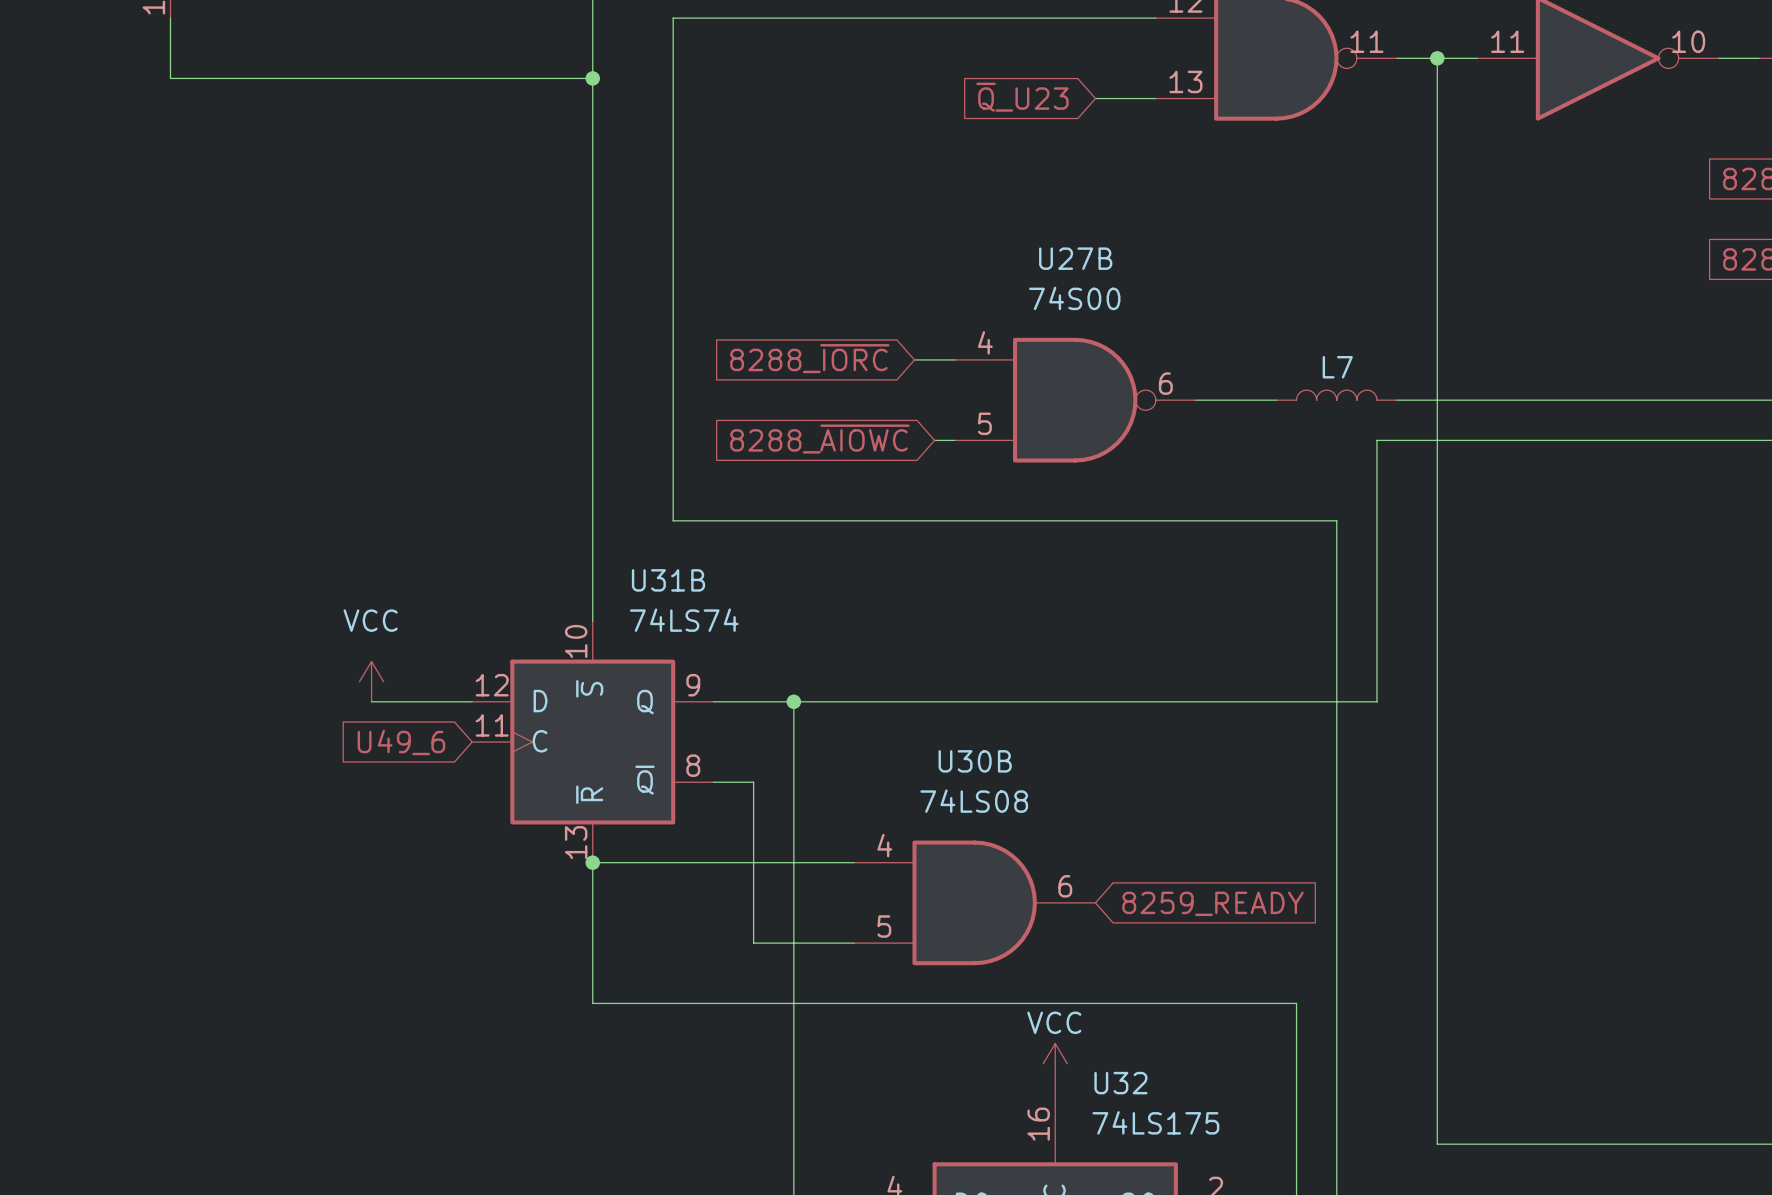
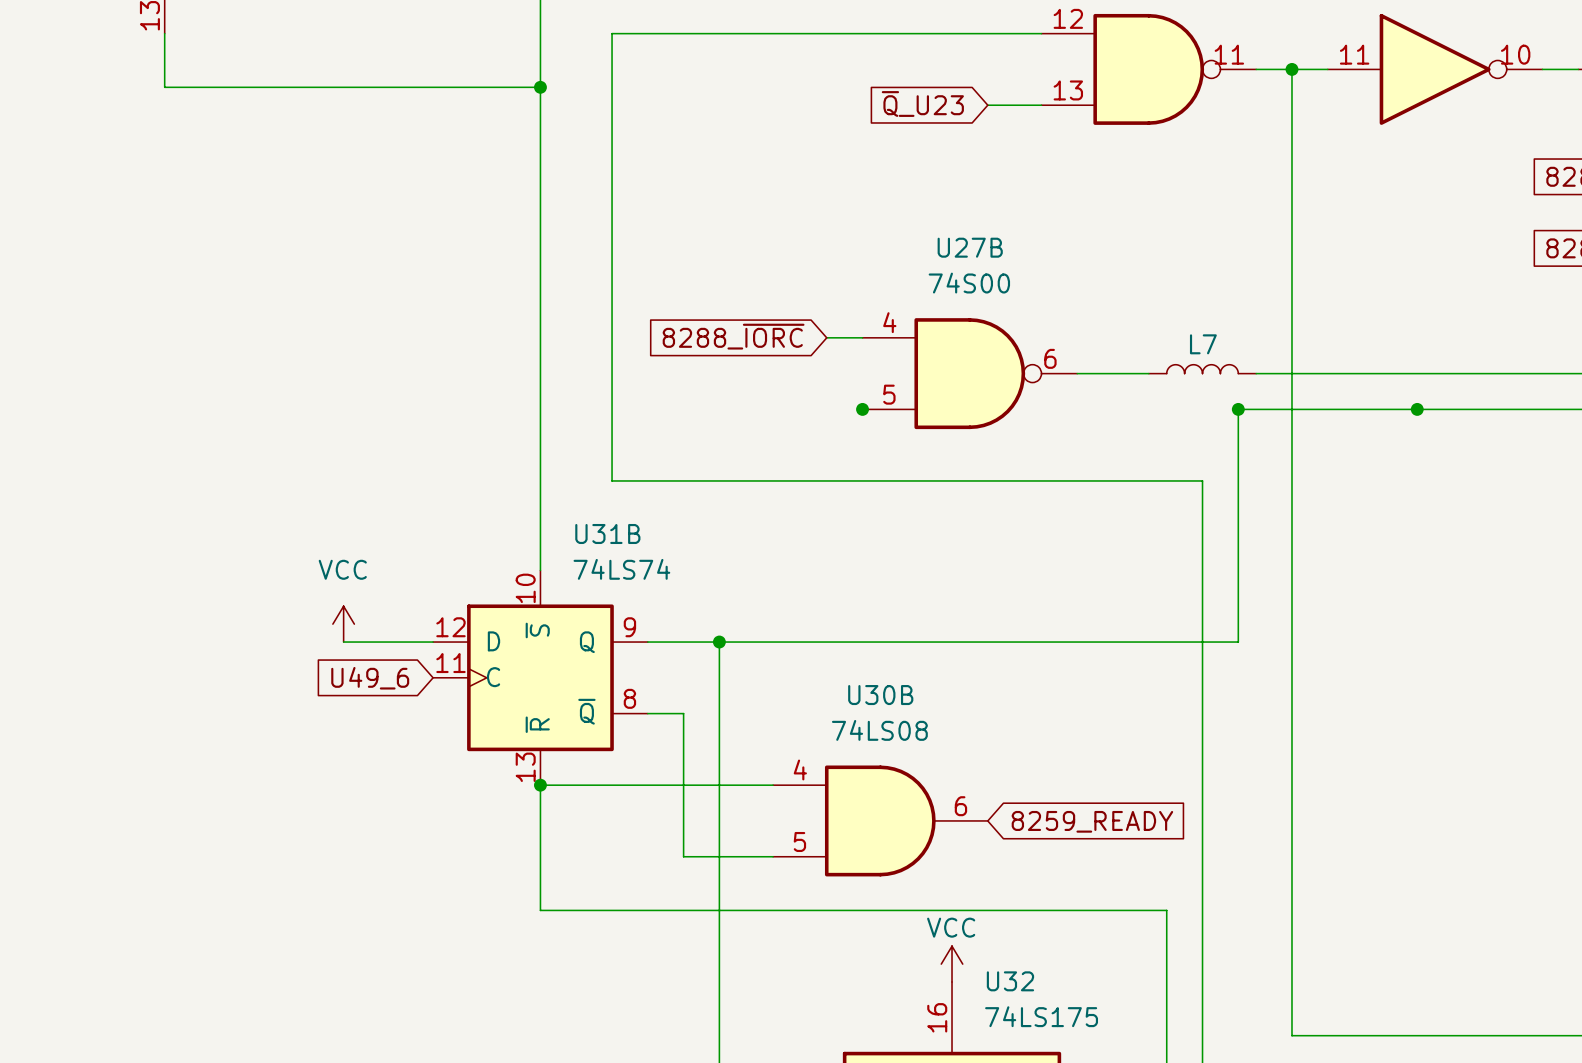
global label: 8288_~{AIOWC} (819, 439) -> none
wire: (934, 440) (954, 440) -> none
junction: none -> (862, 409)
junction: none -> (1238, 409)
junction: none -> (1417, 409)

